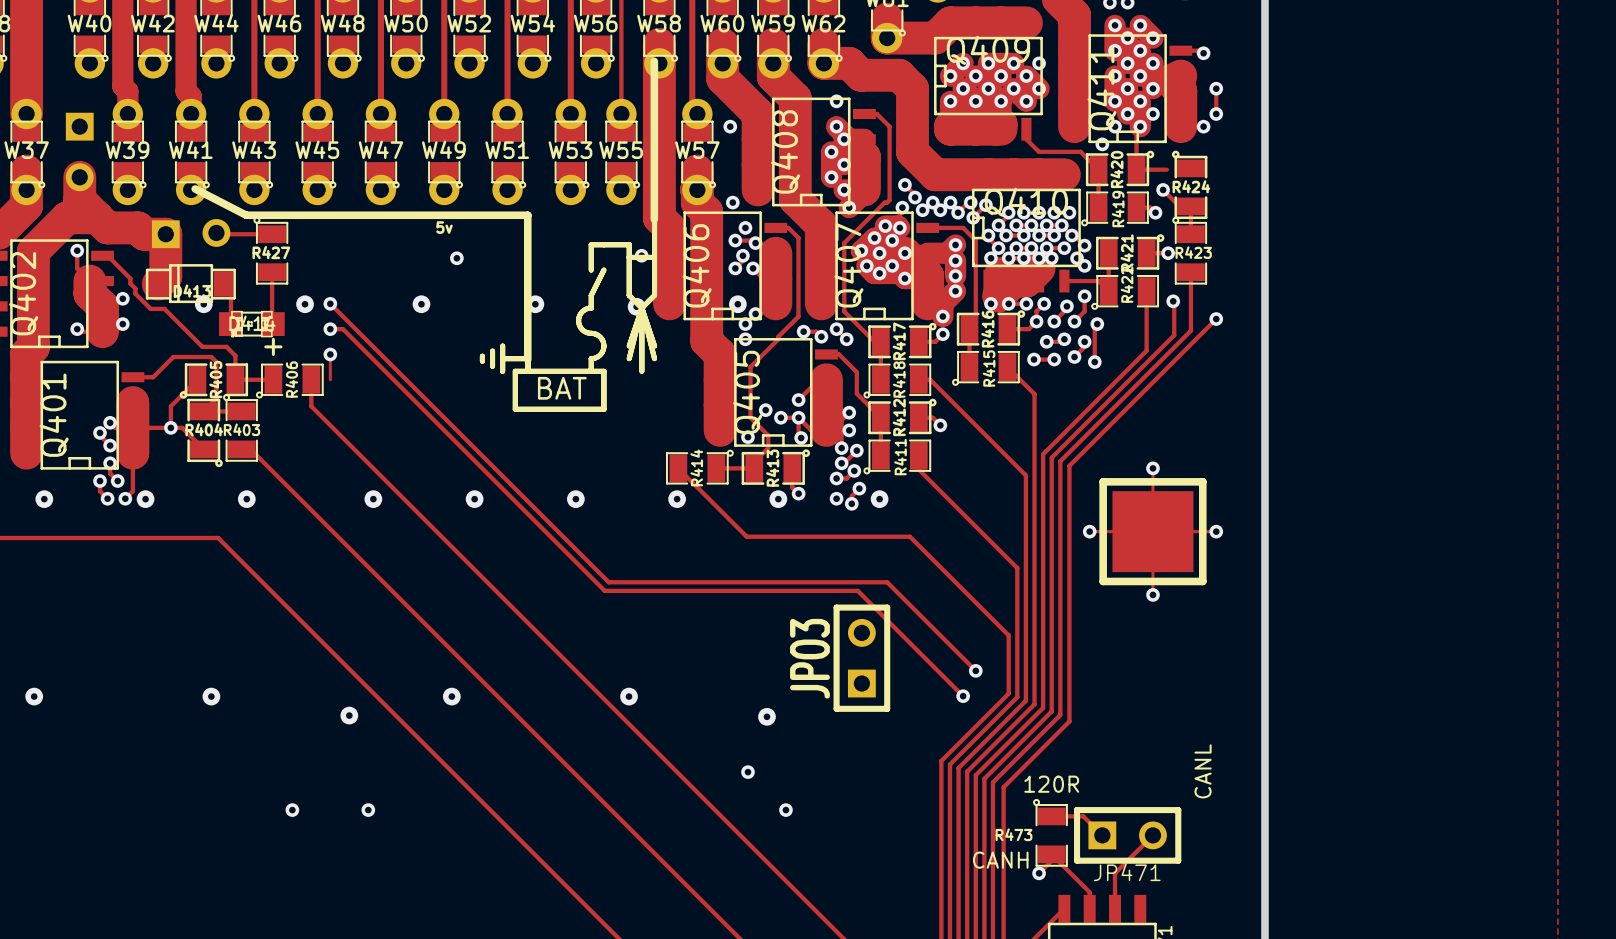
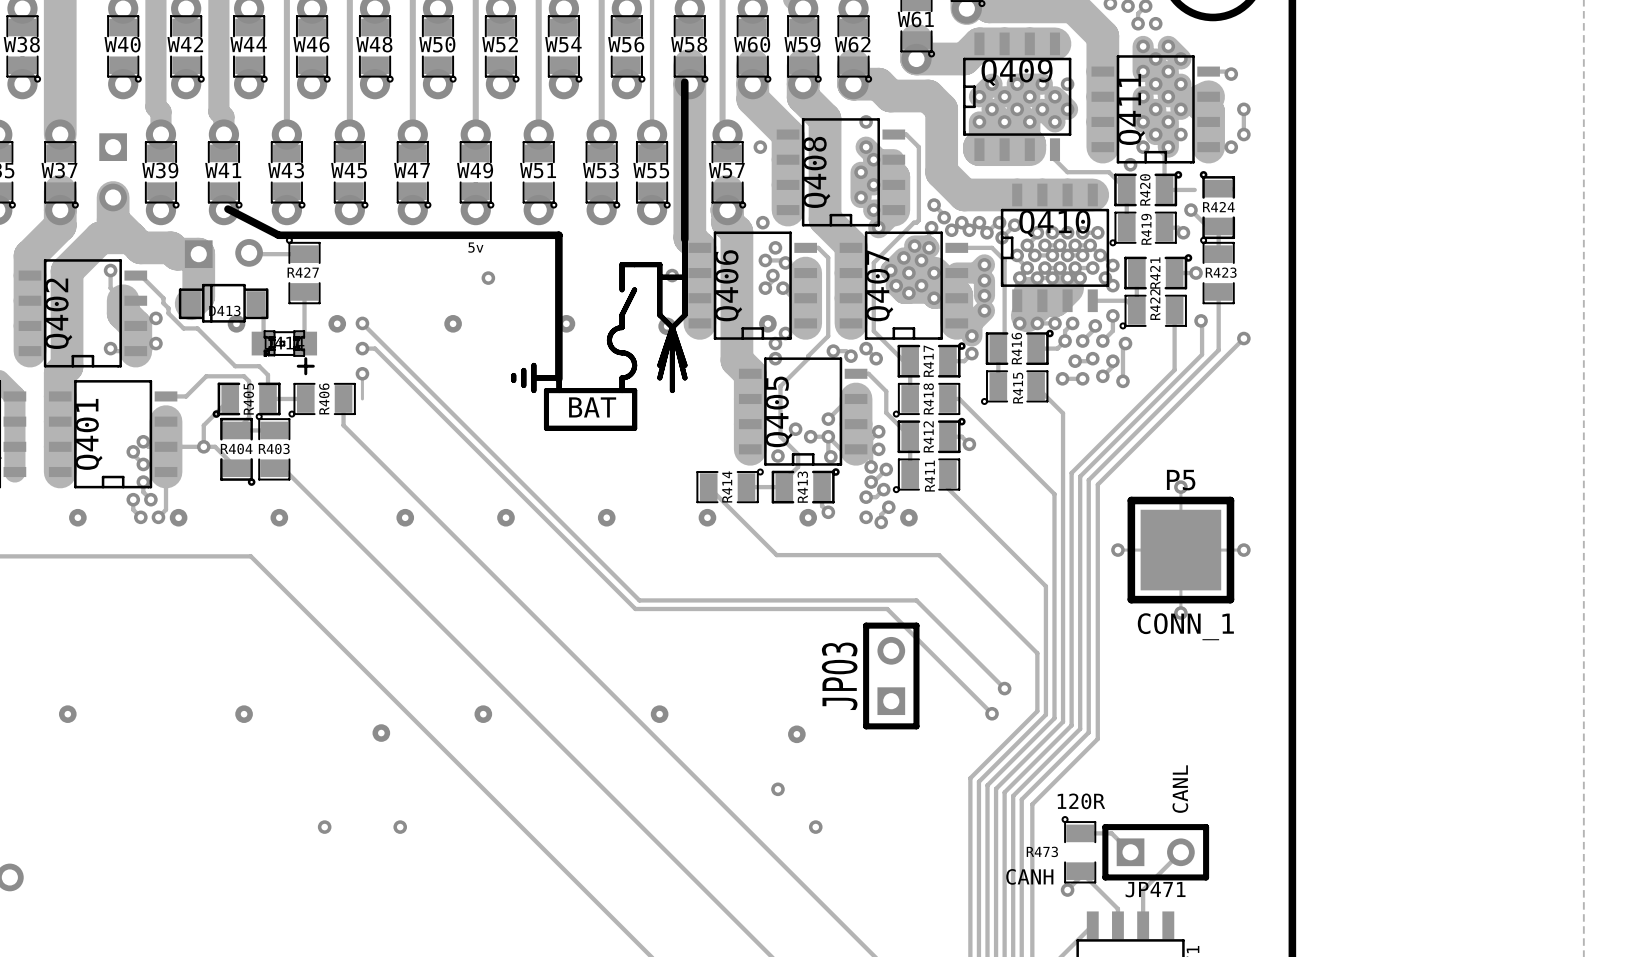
P5 name: none -> P5 (1181, 480)
P5 value: none -> CONN_1 (1185, 626)
text position: CANL (1203, 771) -> CANL (1180, 789)

